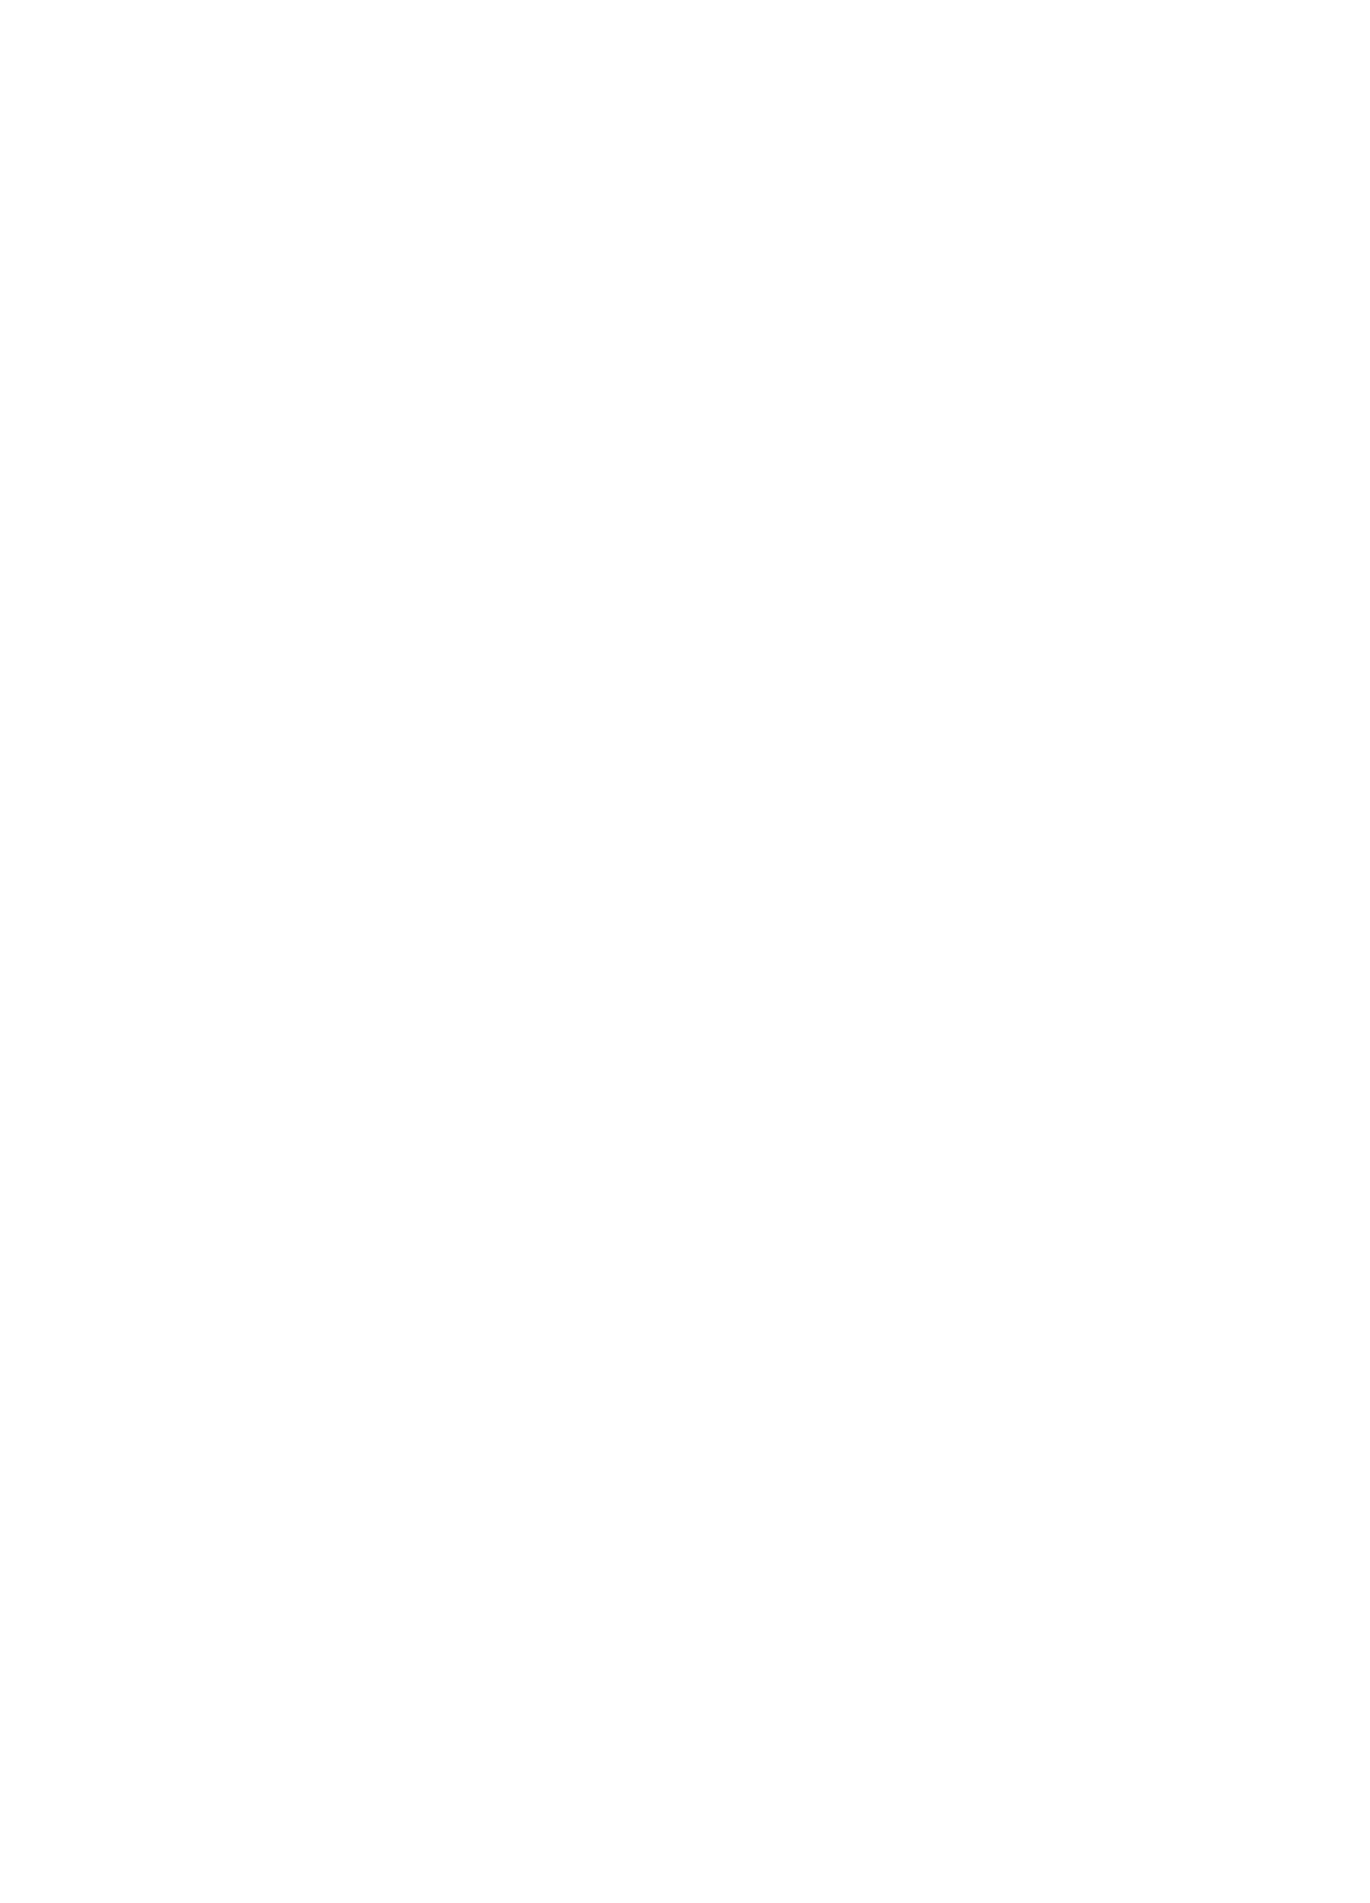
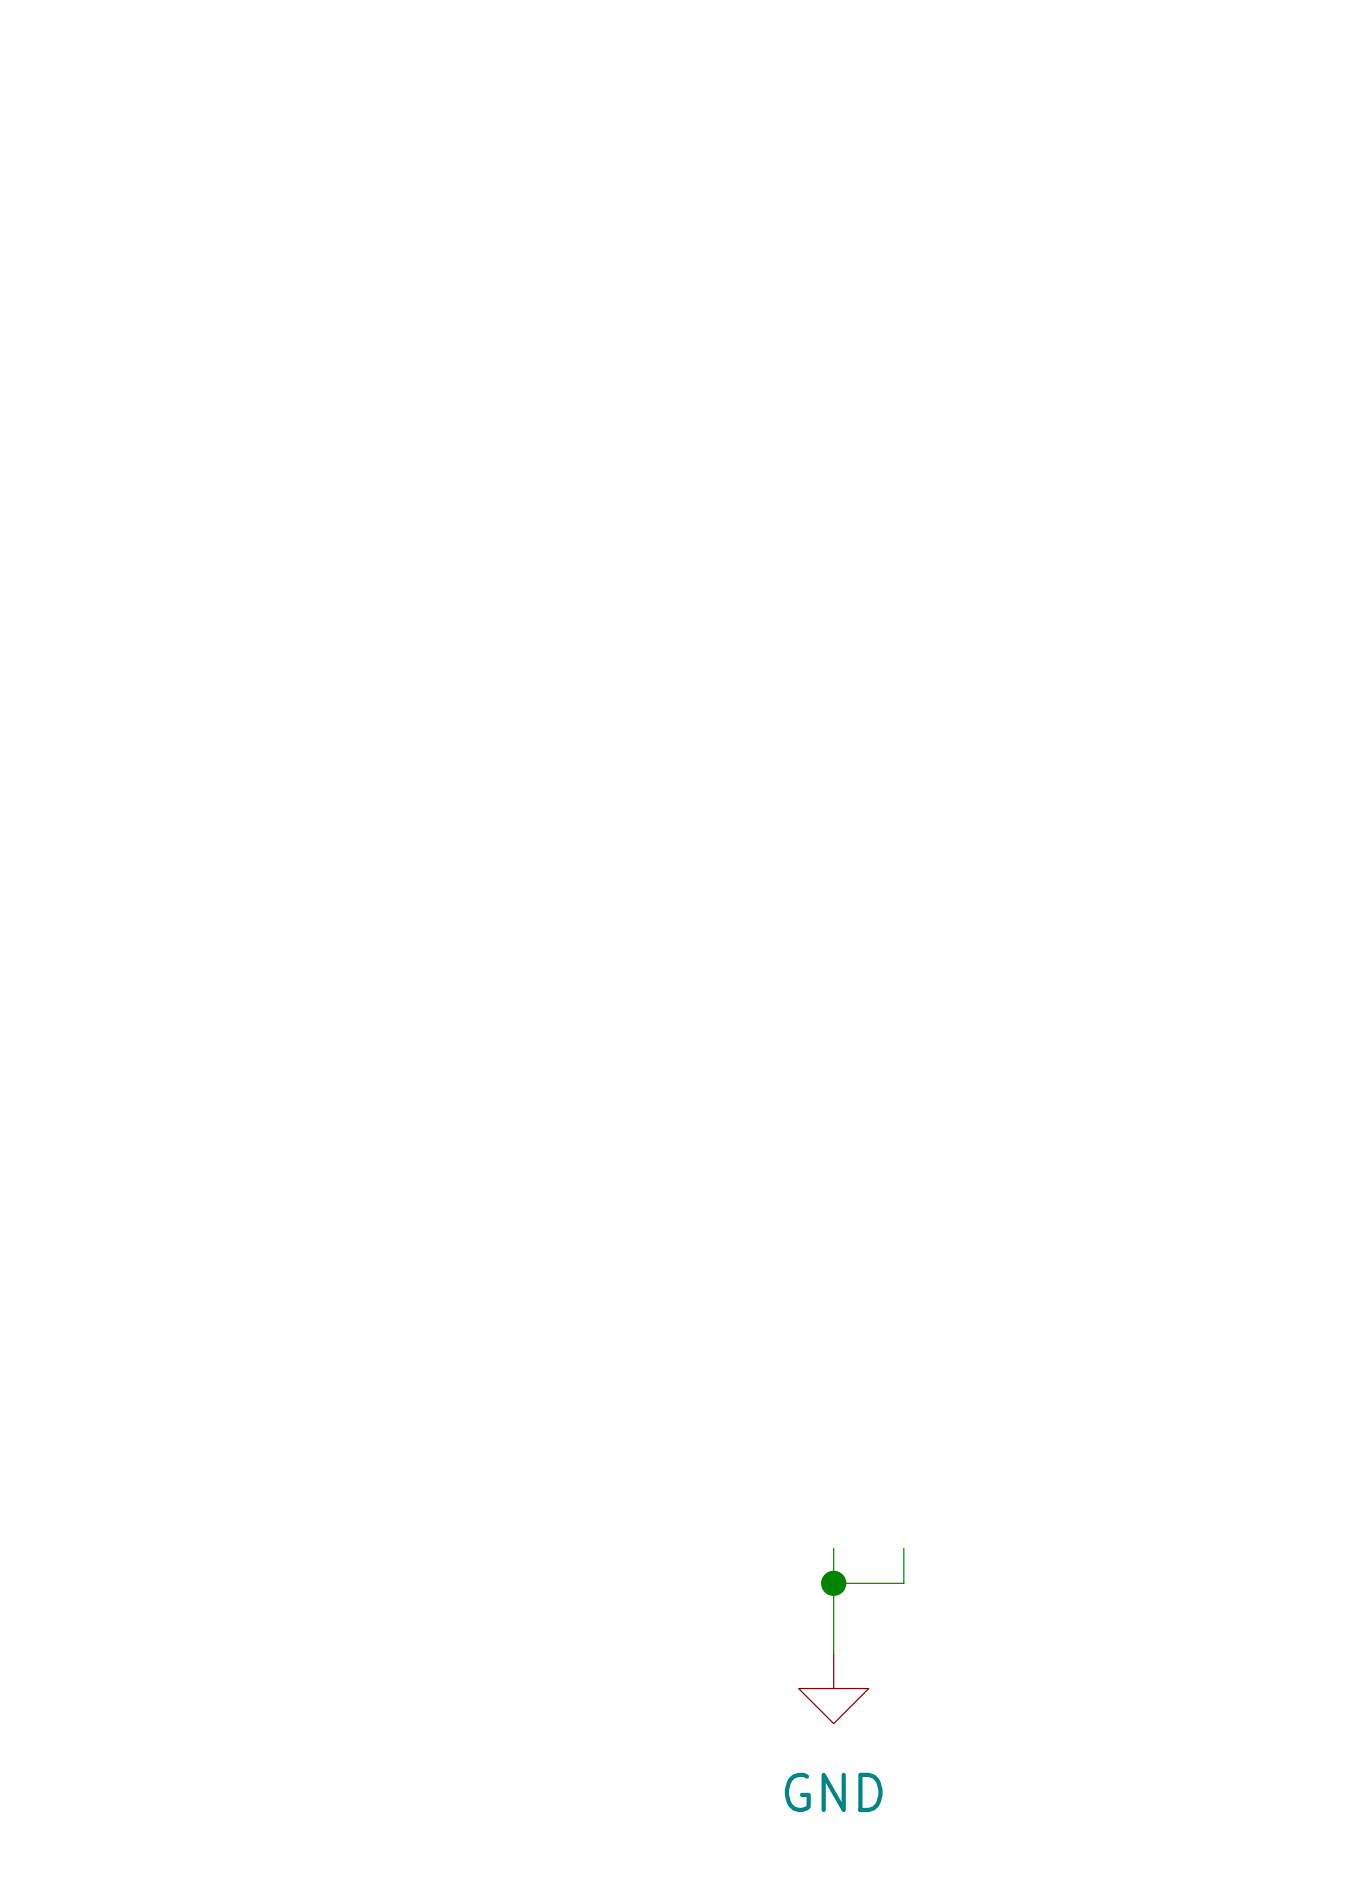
wire: none -> (833, 1548) (833, 1653)
wire: none -> (903, 1548) (903, 1583) (833, 1583)
junction: none -> (833, 1583)
power symbol: none -> GND (833, 1688)

